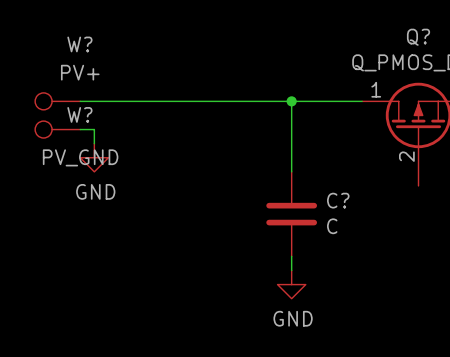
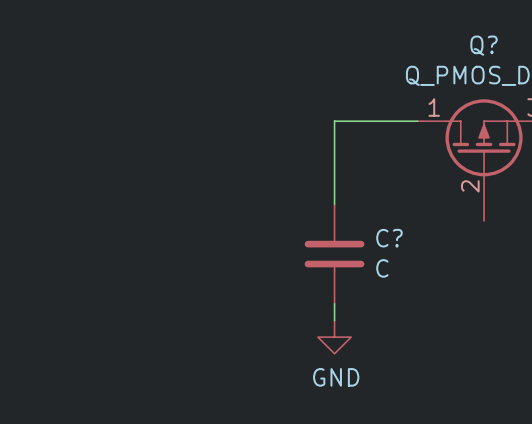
W?: PV+ (57, 101) -> none
wire: (80, 101) (291, 101) -> none
junction: (291, 101) -> none
W?: PV_GND (57, 129) -> none
wire: (80, 129) (94, 129) (94, 143) -> none
power symbol: GND (94, 157) -> none

